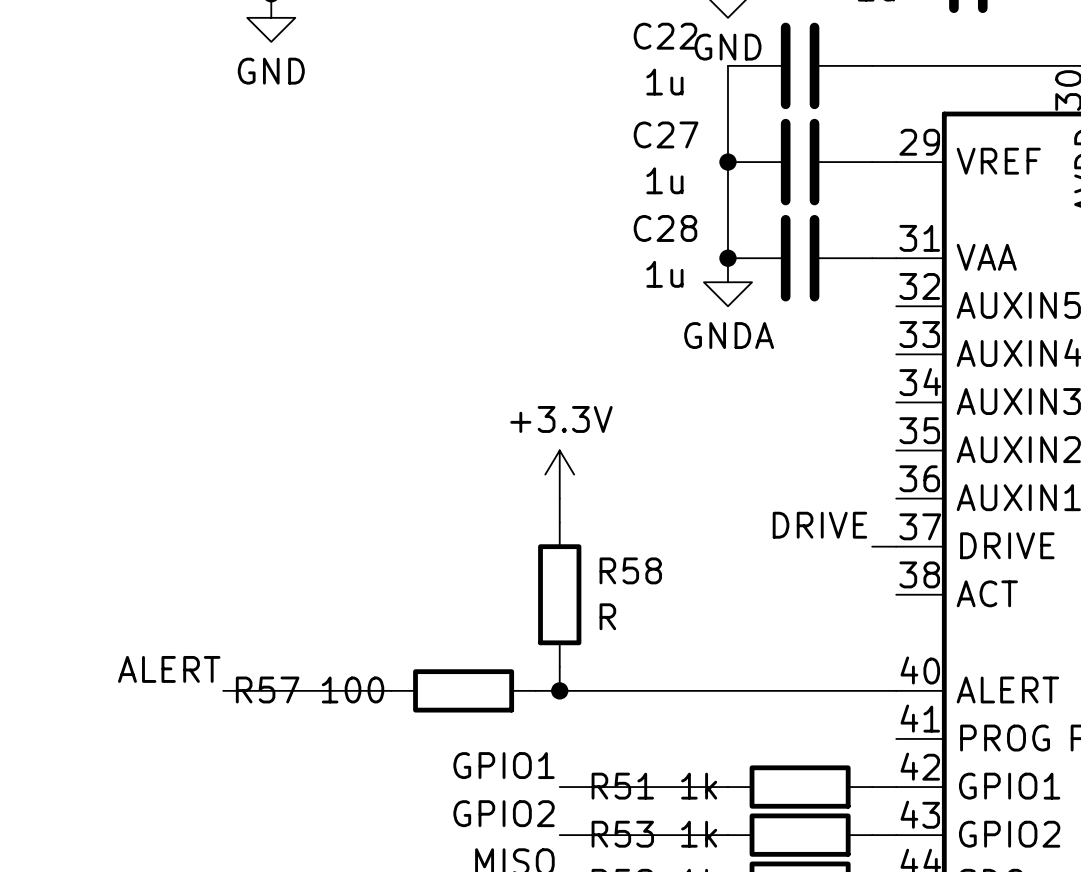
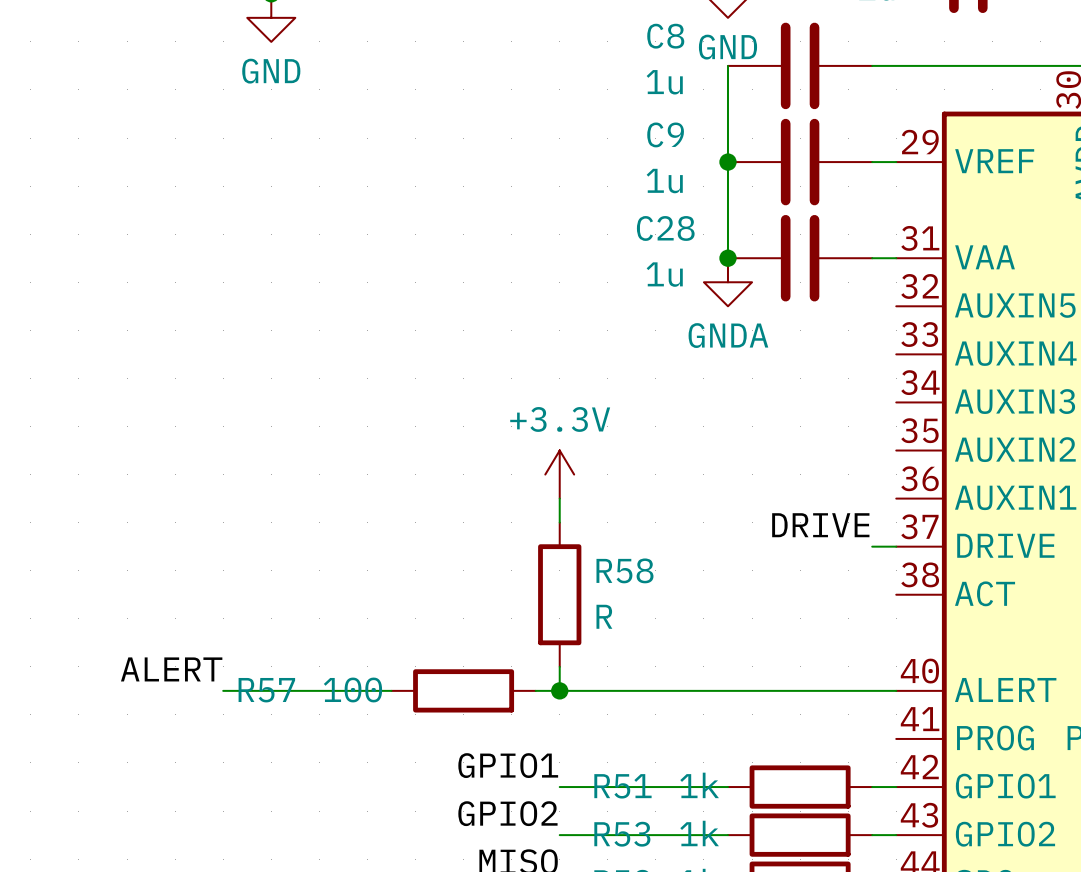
C22 name: C22 (665, 36) -> C8 (665, 36)
C27 name: C27 (666, 134) -> C9 (665, 134)

